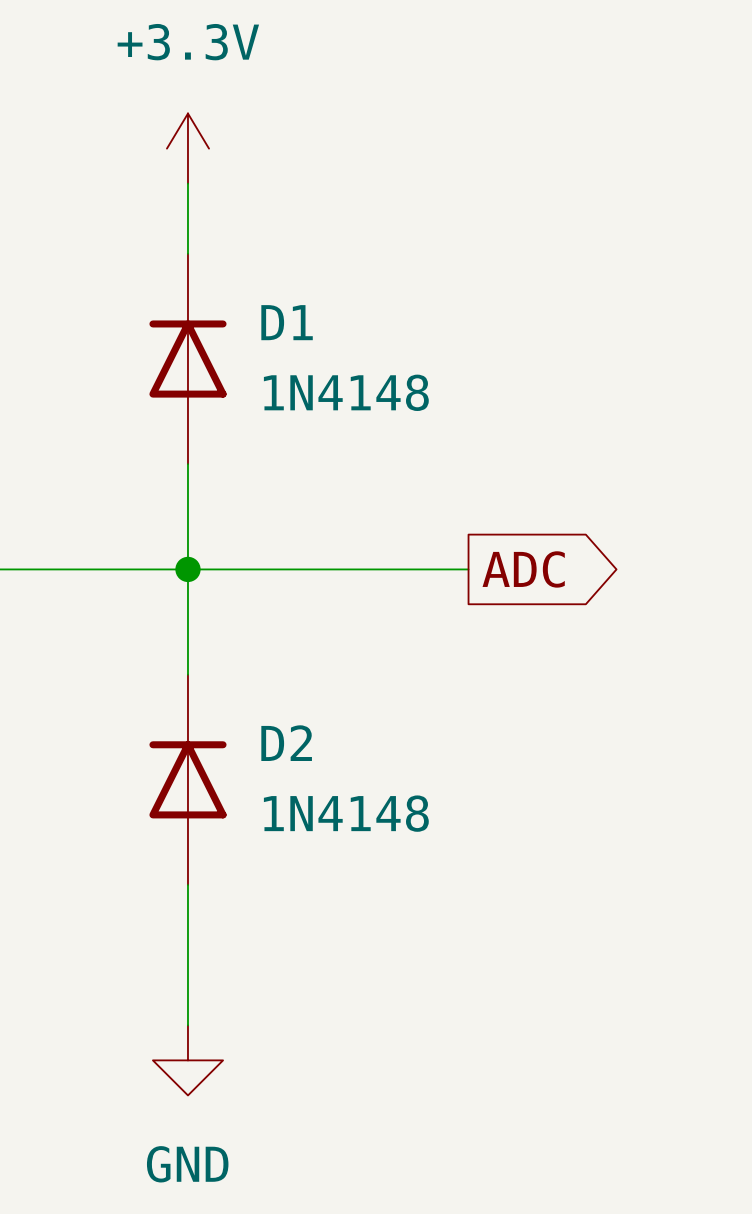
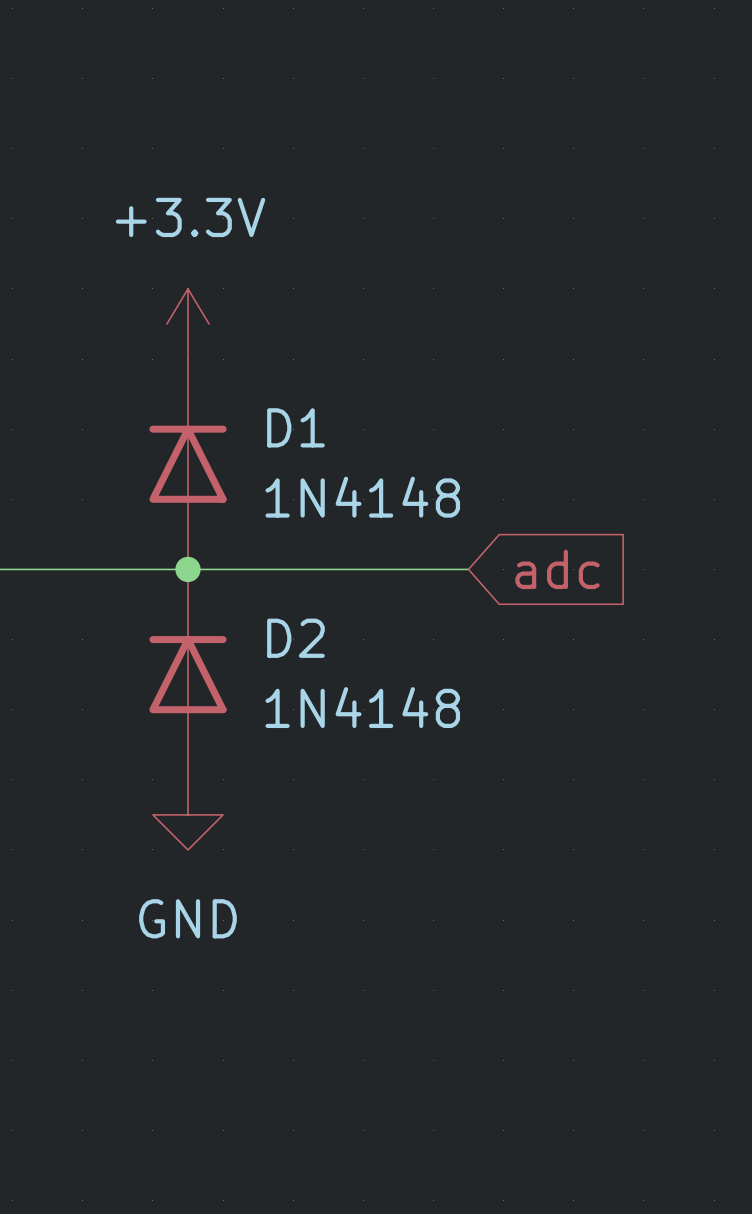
power symbol position: +3.3V (187, 148) -> +3.3V (187, 323)
wire: (187, 183) (187, 253) -> none
D1 position: (187, 359) -> (187, 464)
global label shape: output (523, 569) -> input (557, 569)
global label: ADC (523, 569) -> adc (557, 569)
D2 position: (187, 779) -> (187, 674)
wire: (187, 885) (187, 1025) -> none
power symbol position: GND (187, 1060) -> GND (187, 814)

